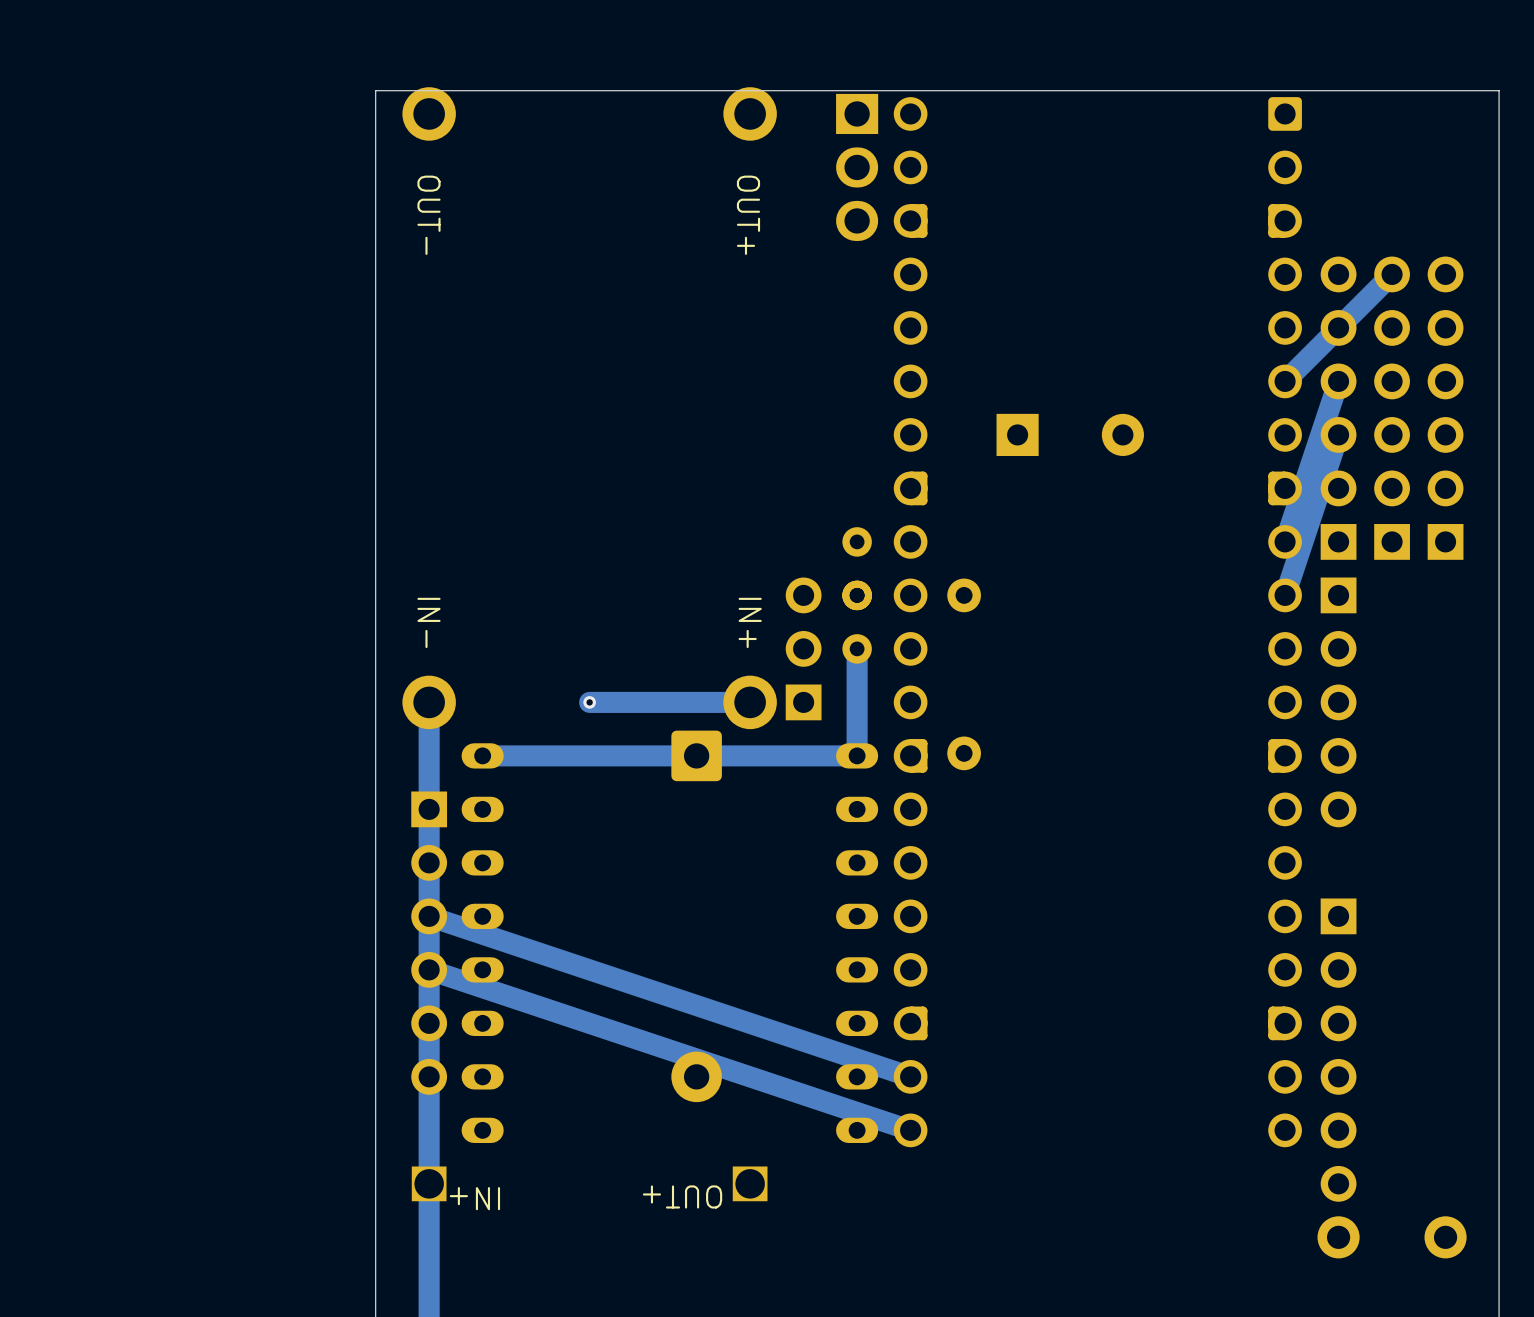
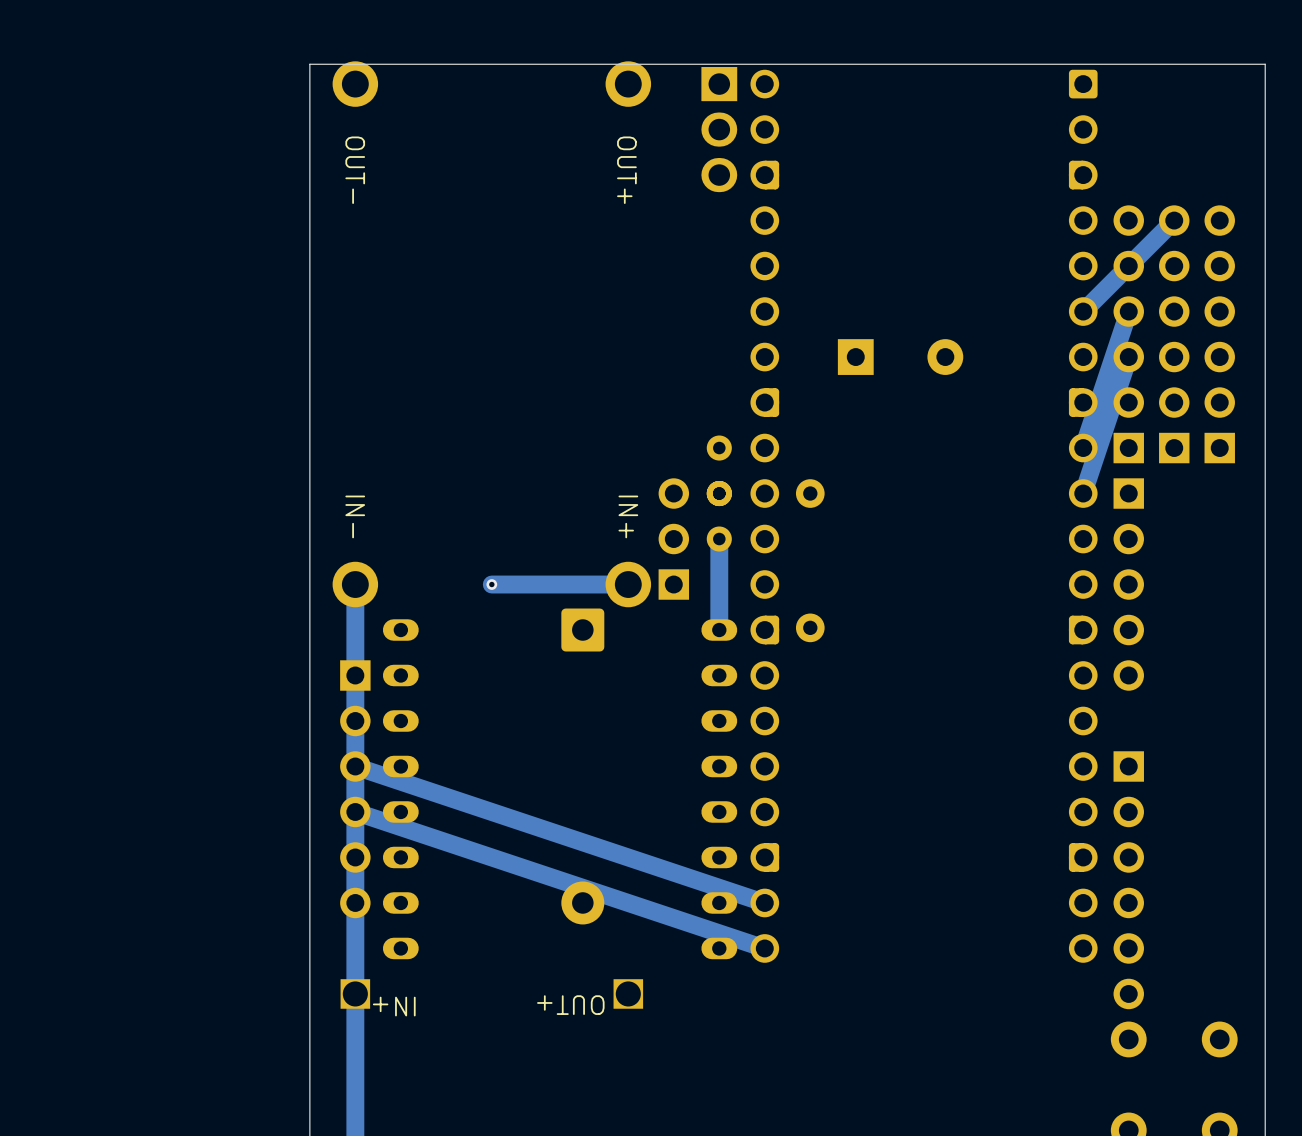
track: (857, 755) (482, 755) -> none

